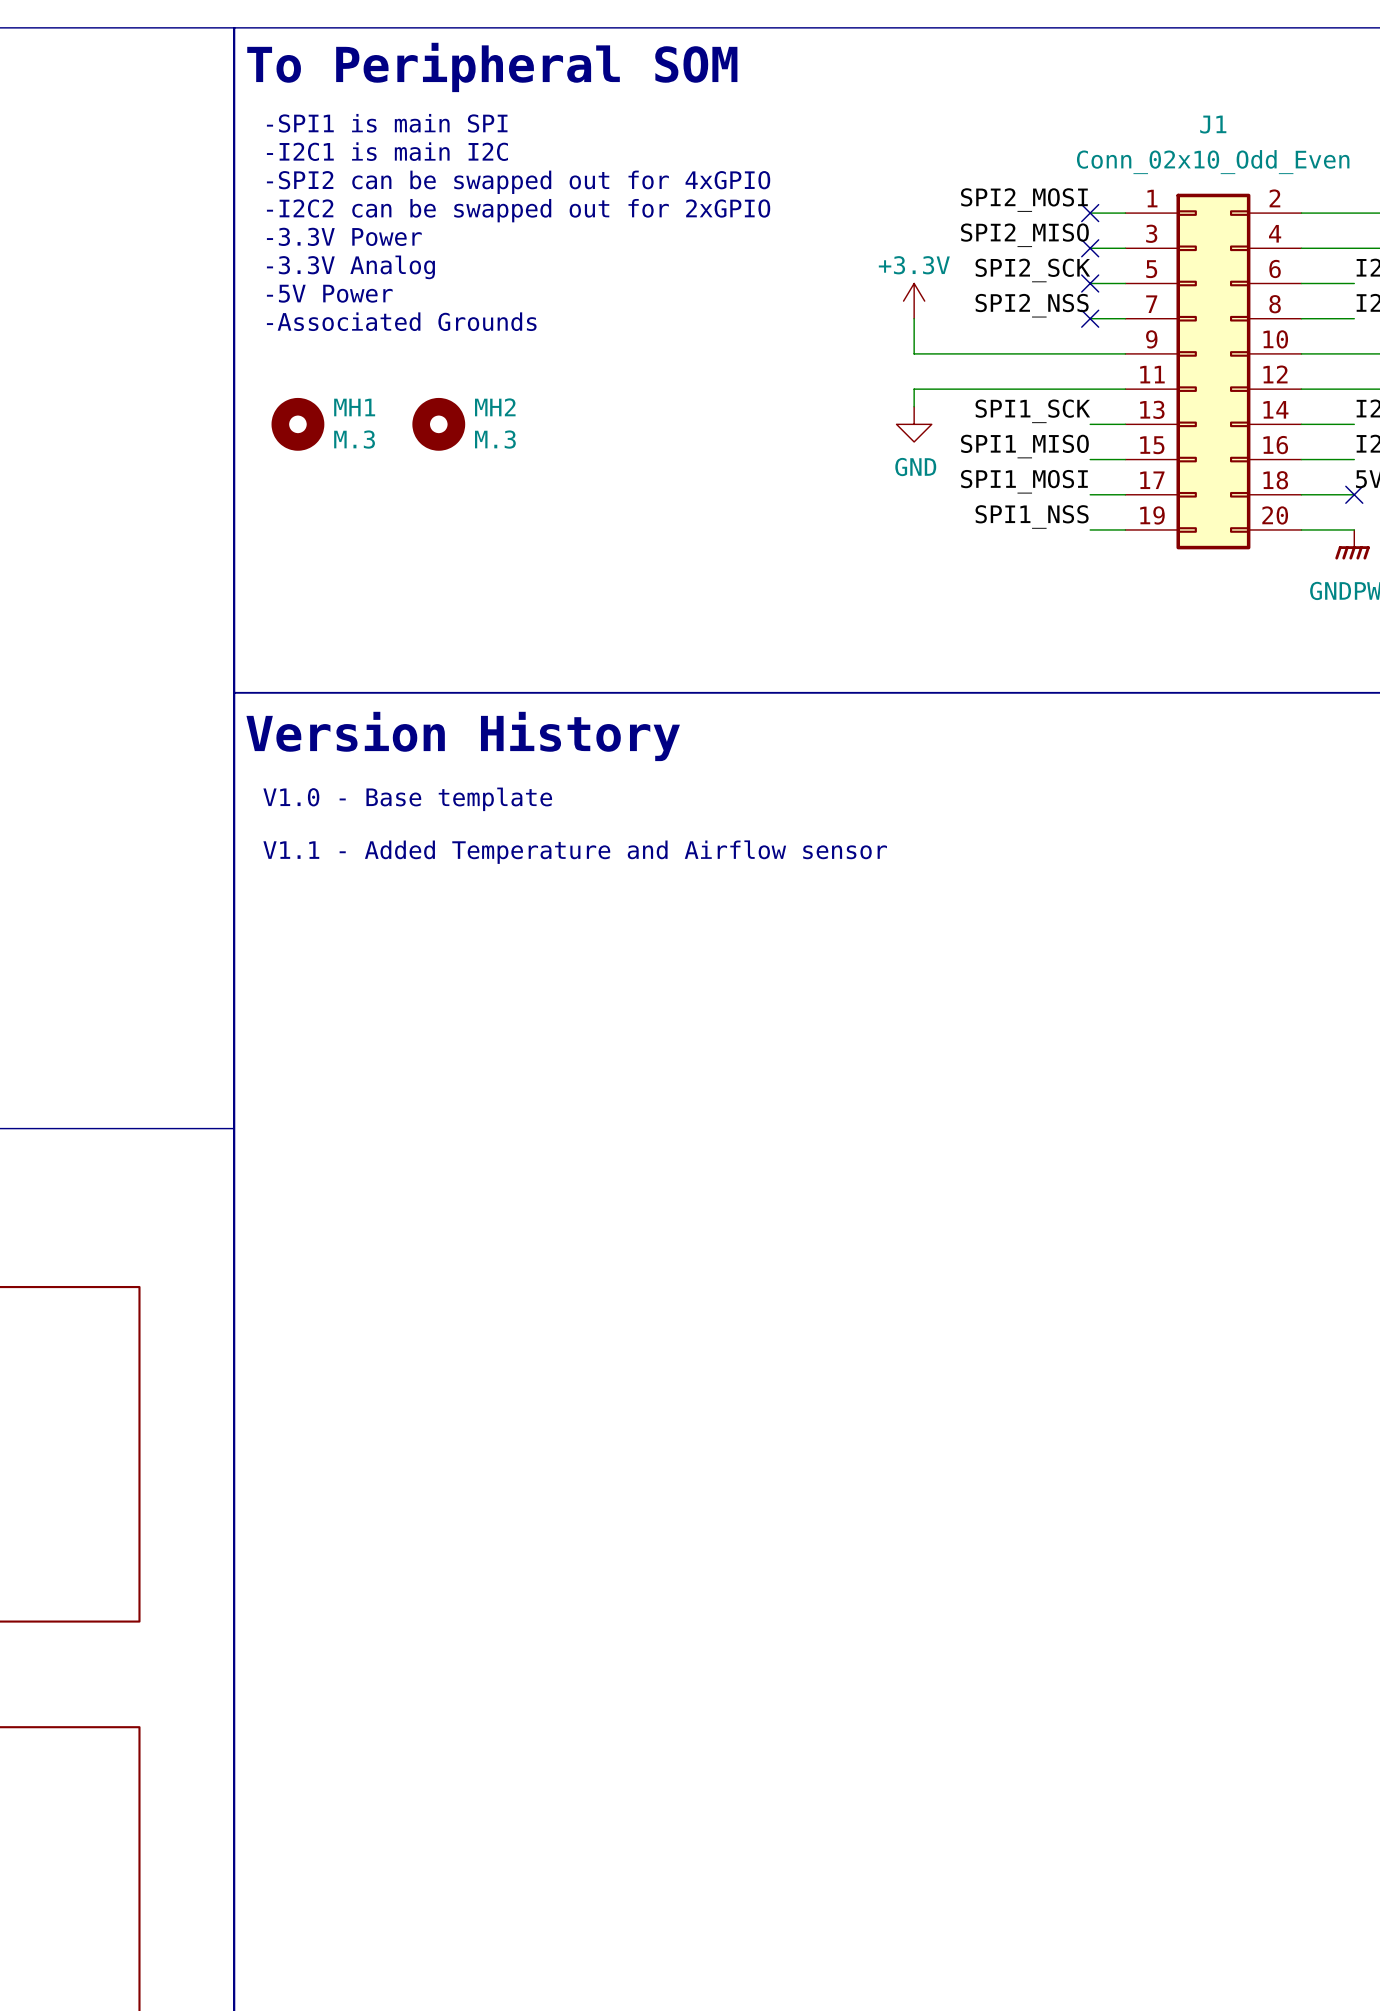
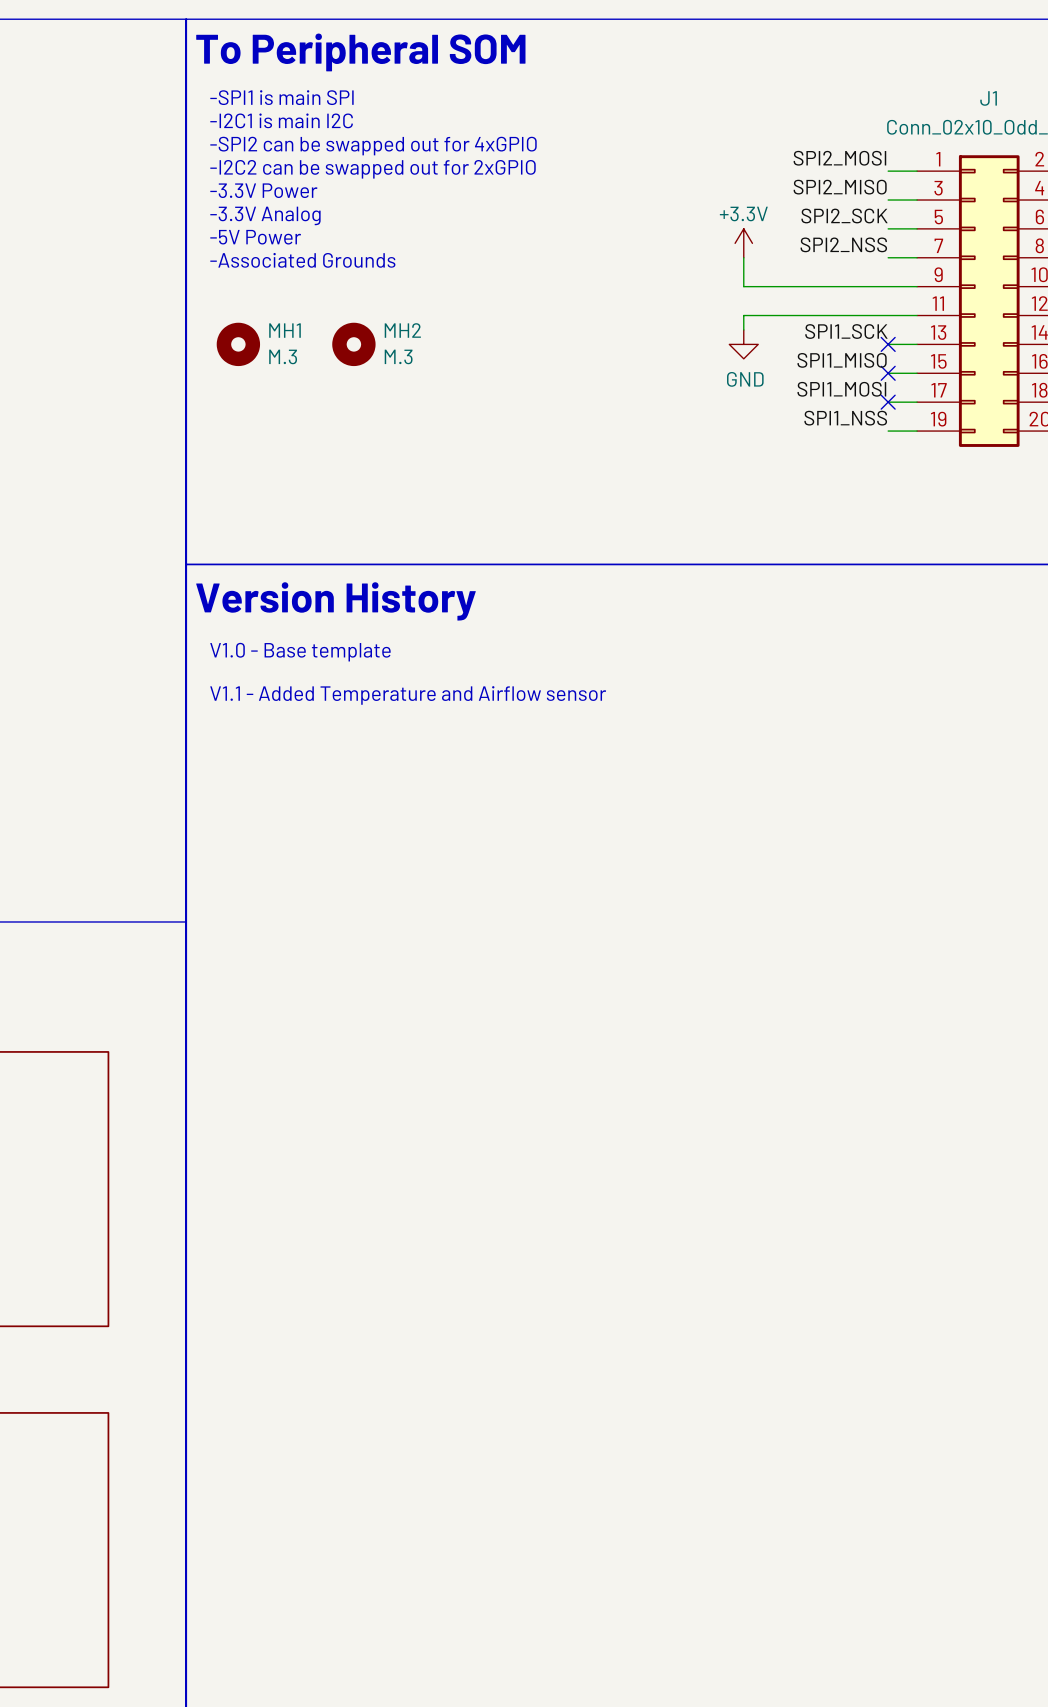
no-connect mark: (1090, 213) -> none
no-connect mark: (1090, 248) -> none
no-connect mark: (1090, 283) -> none
no-connect mark: (1090, 318) -> none
no-connect mark: none -> (888, 344)
no-connect mark: none -> (888, 373)
no-connect mark: none -> (888, 402)

